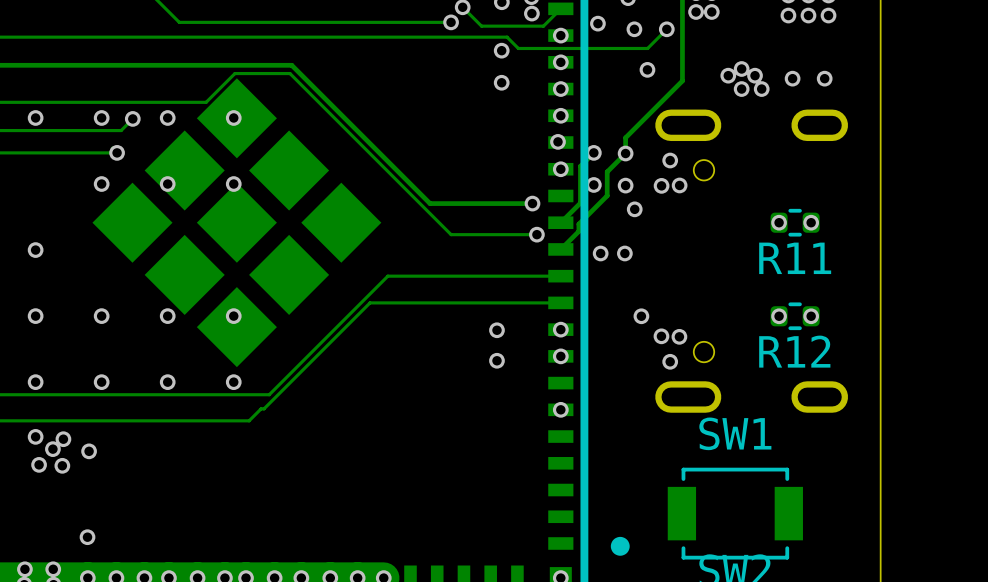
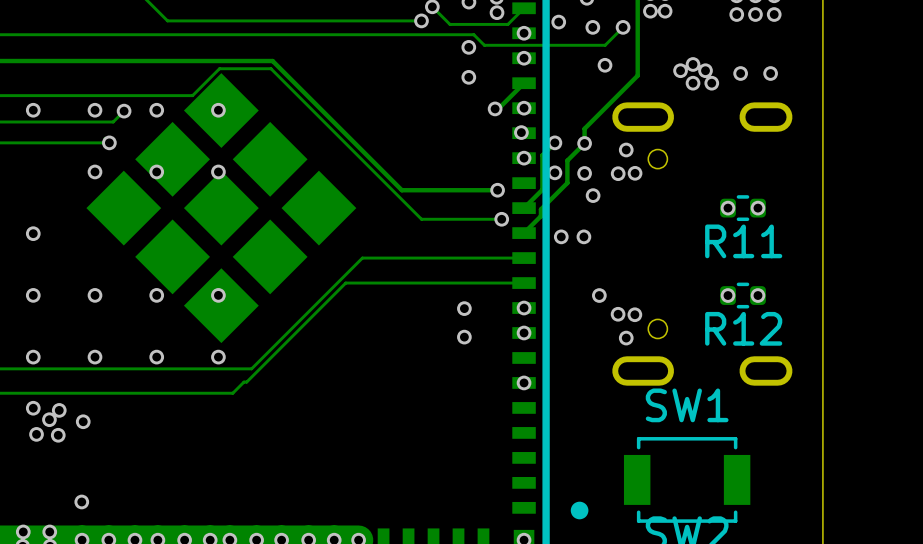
track: none -> (524, 83) (498, 108) (495, 108)
via position: (560, 89) -> (495, 108)

